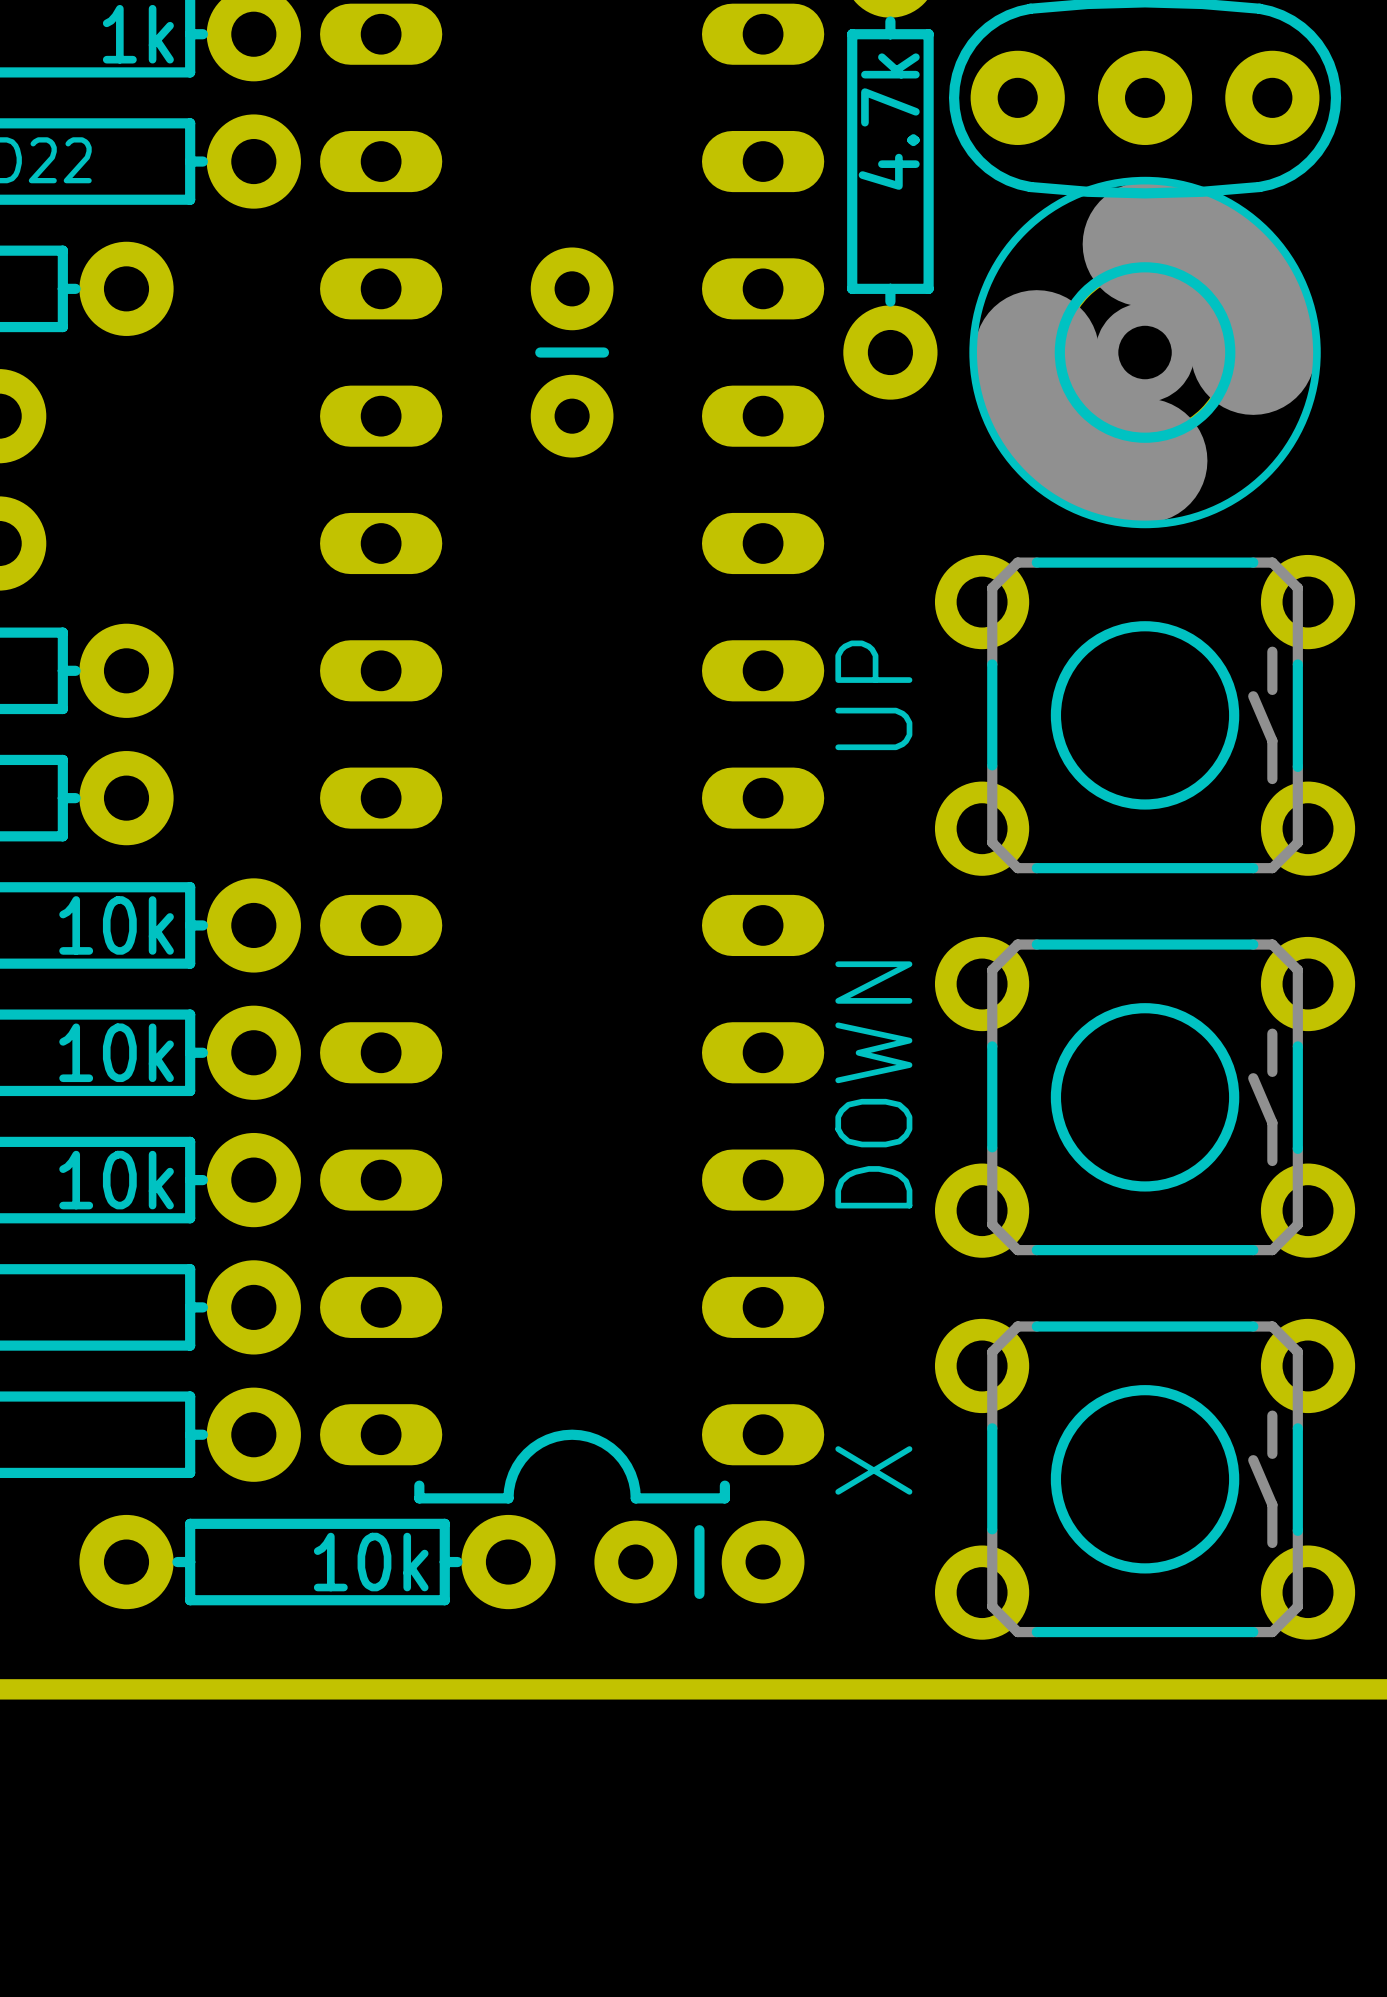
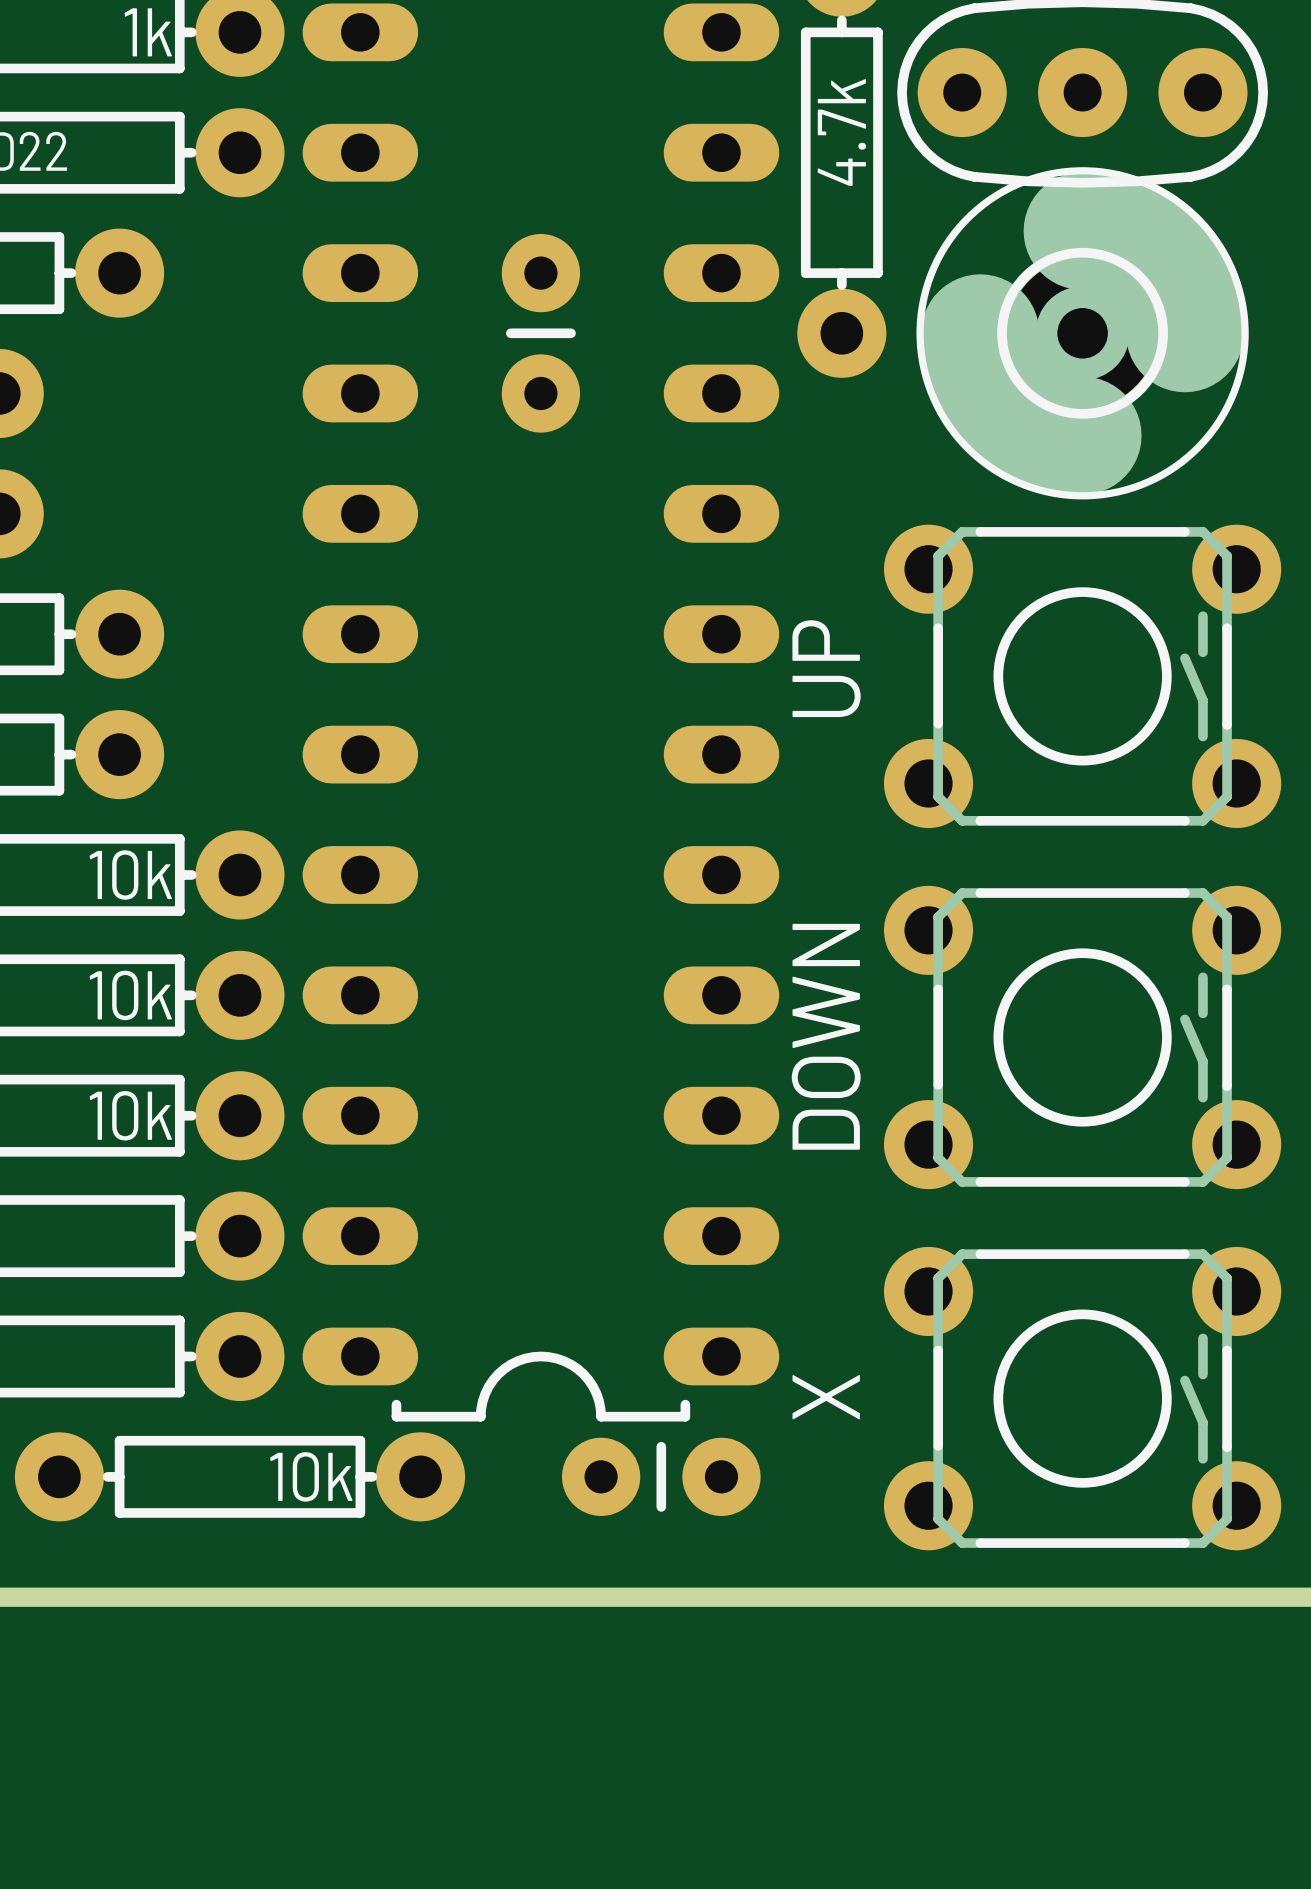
part position: (317, 1562) -> (239, 1476)

